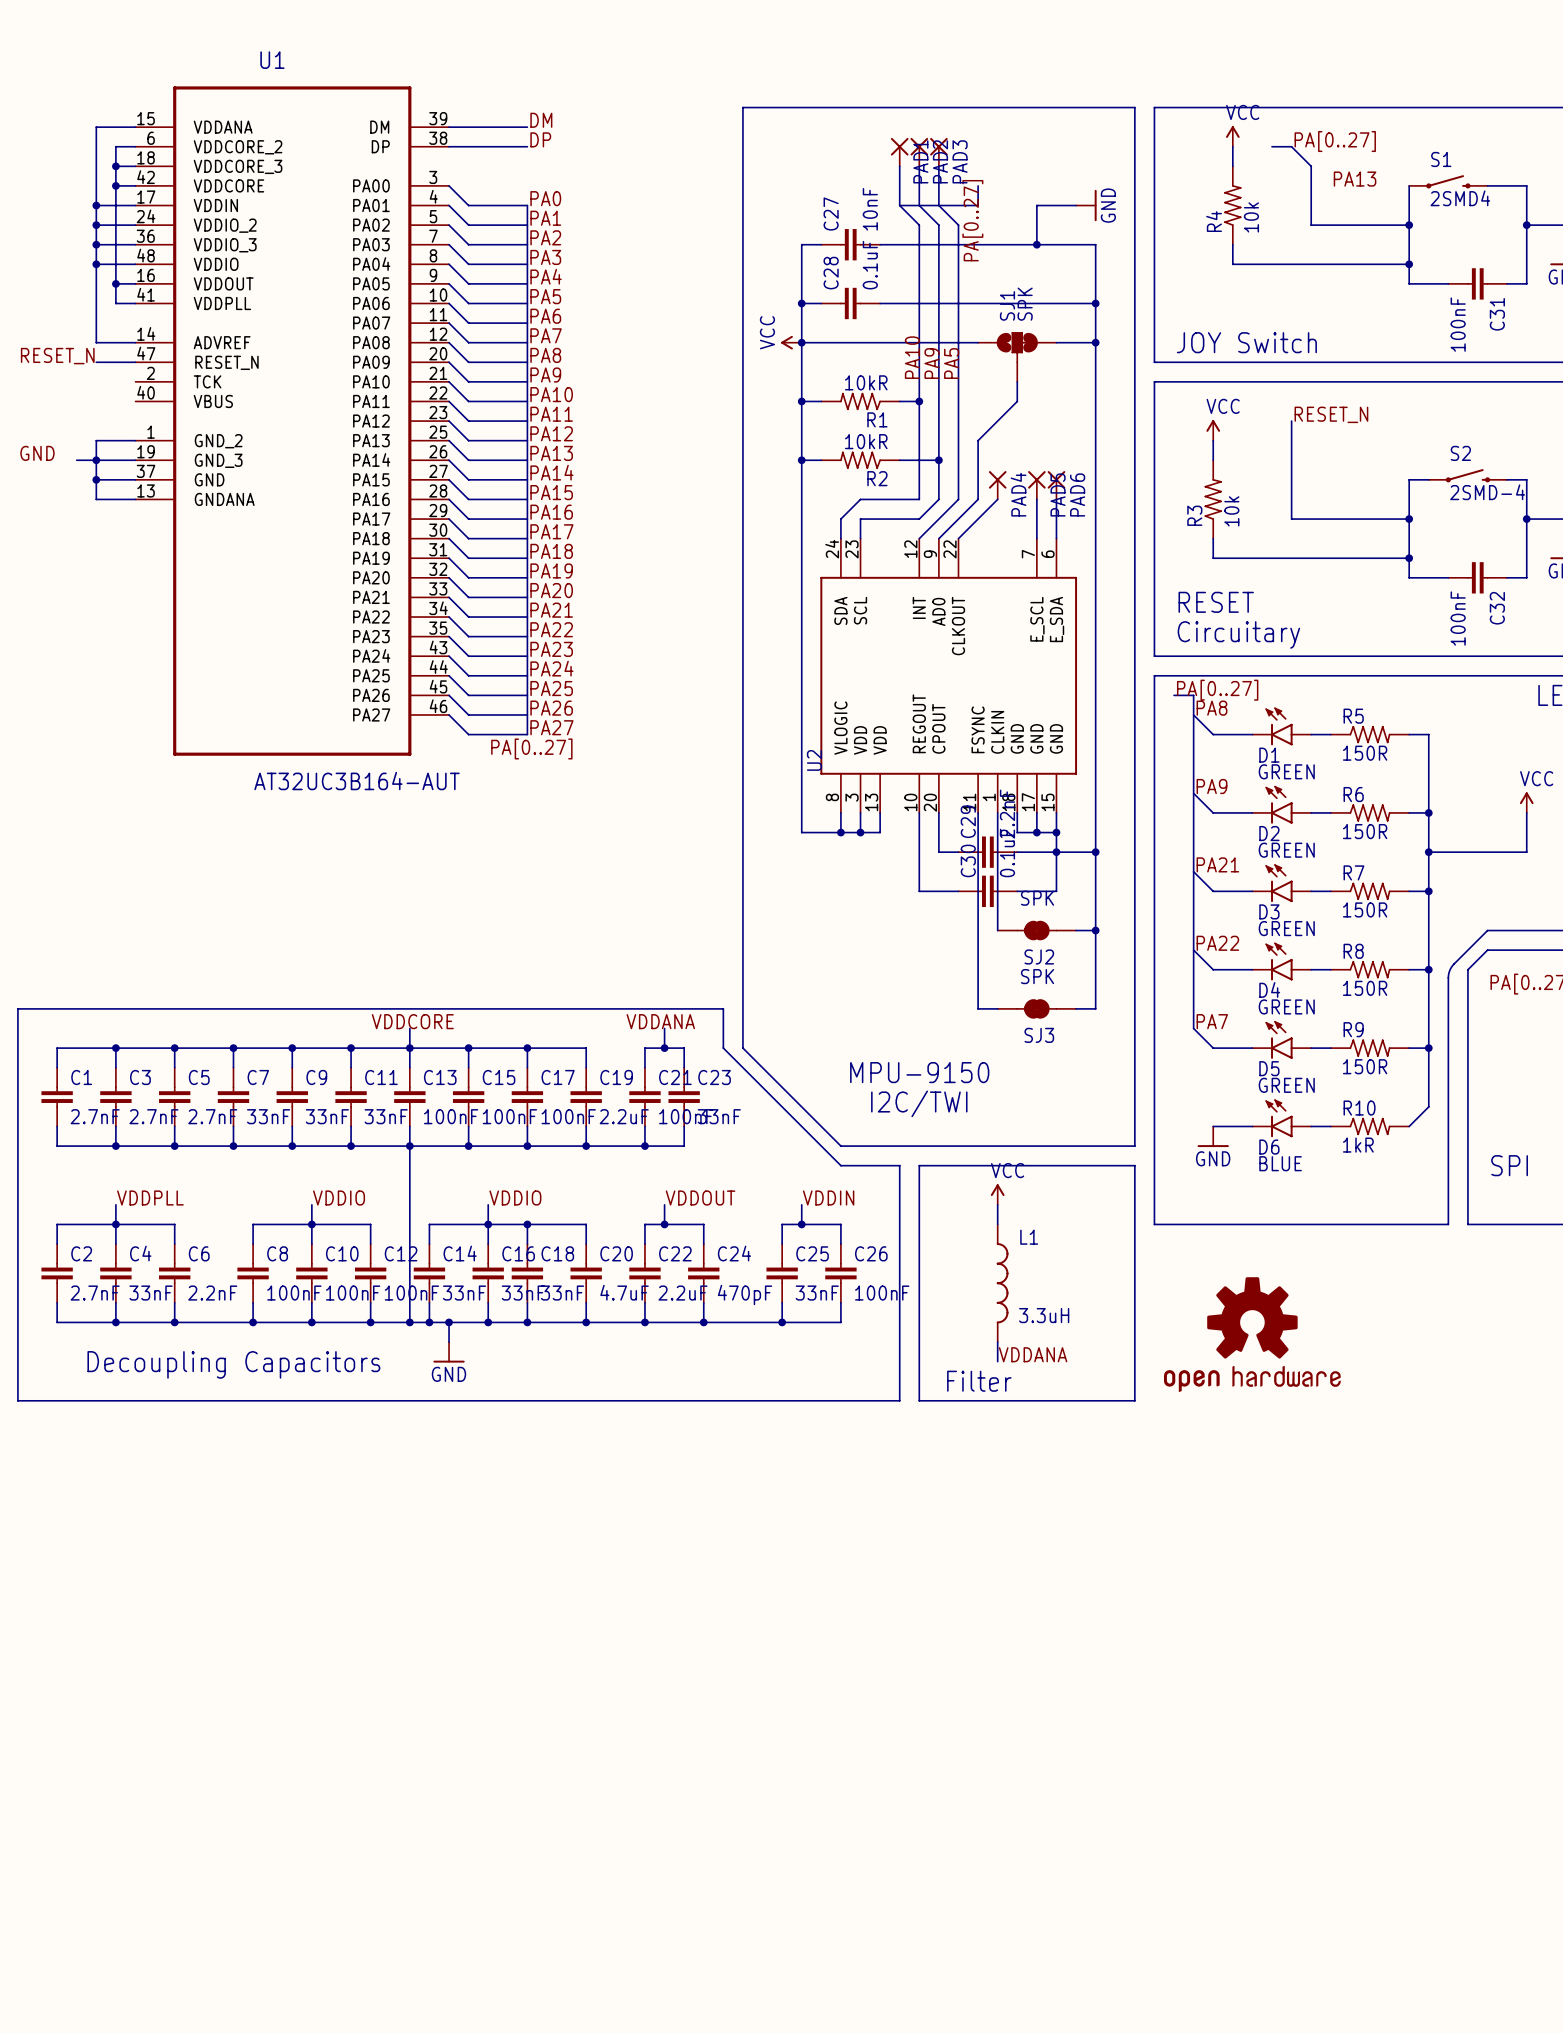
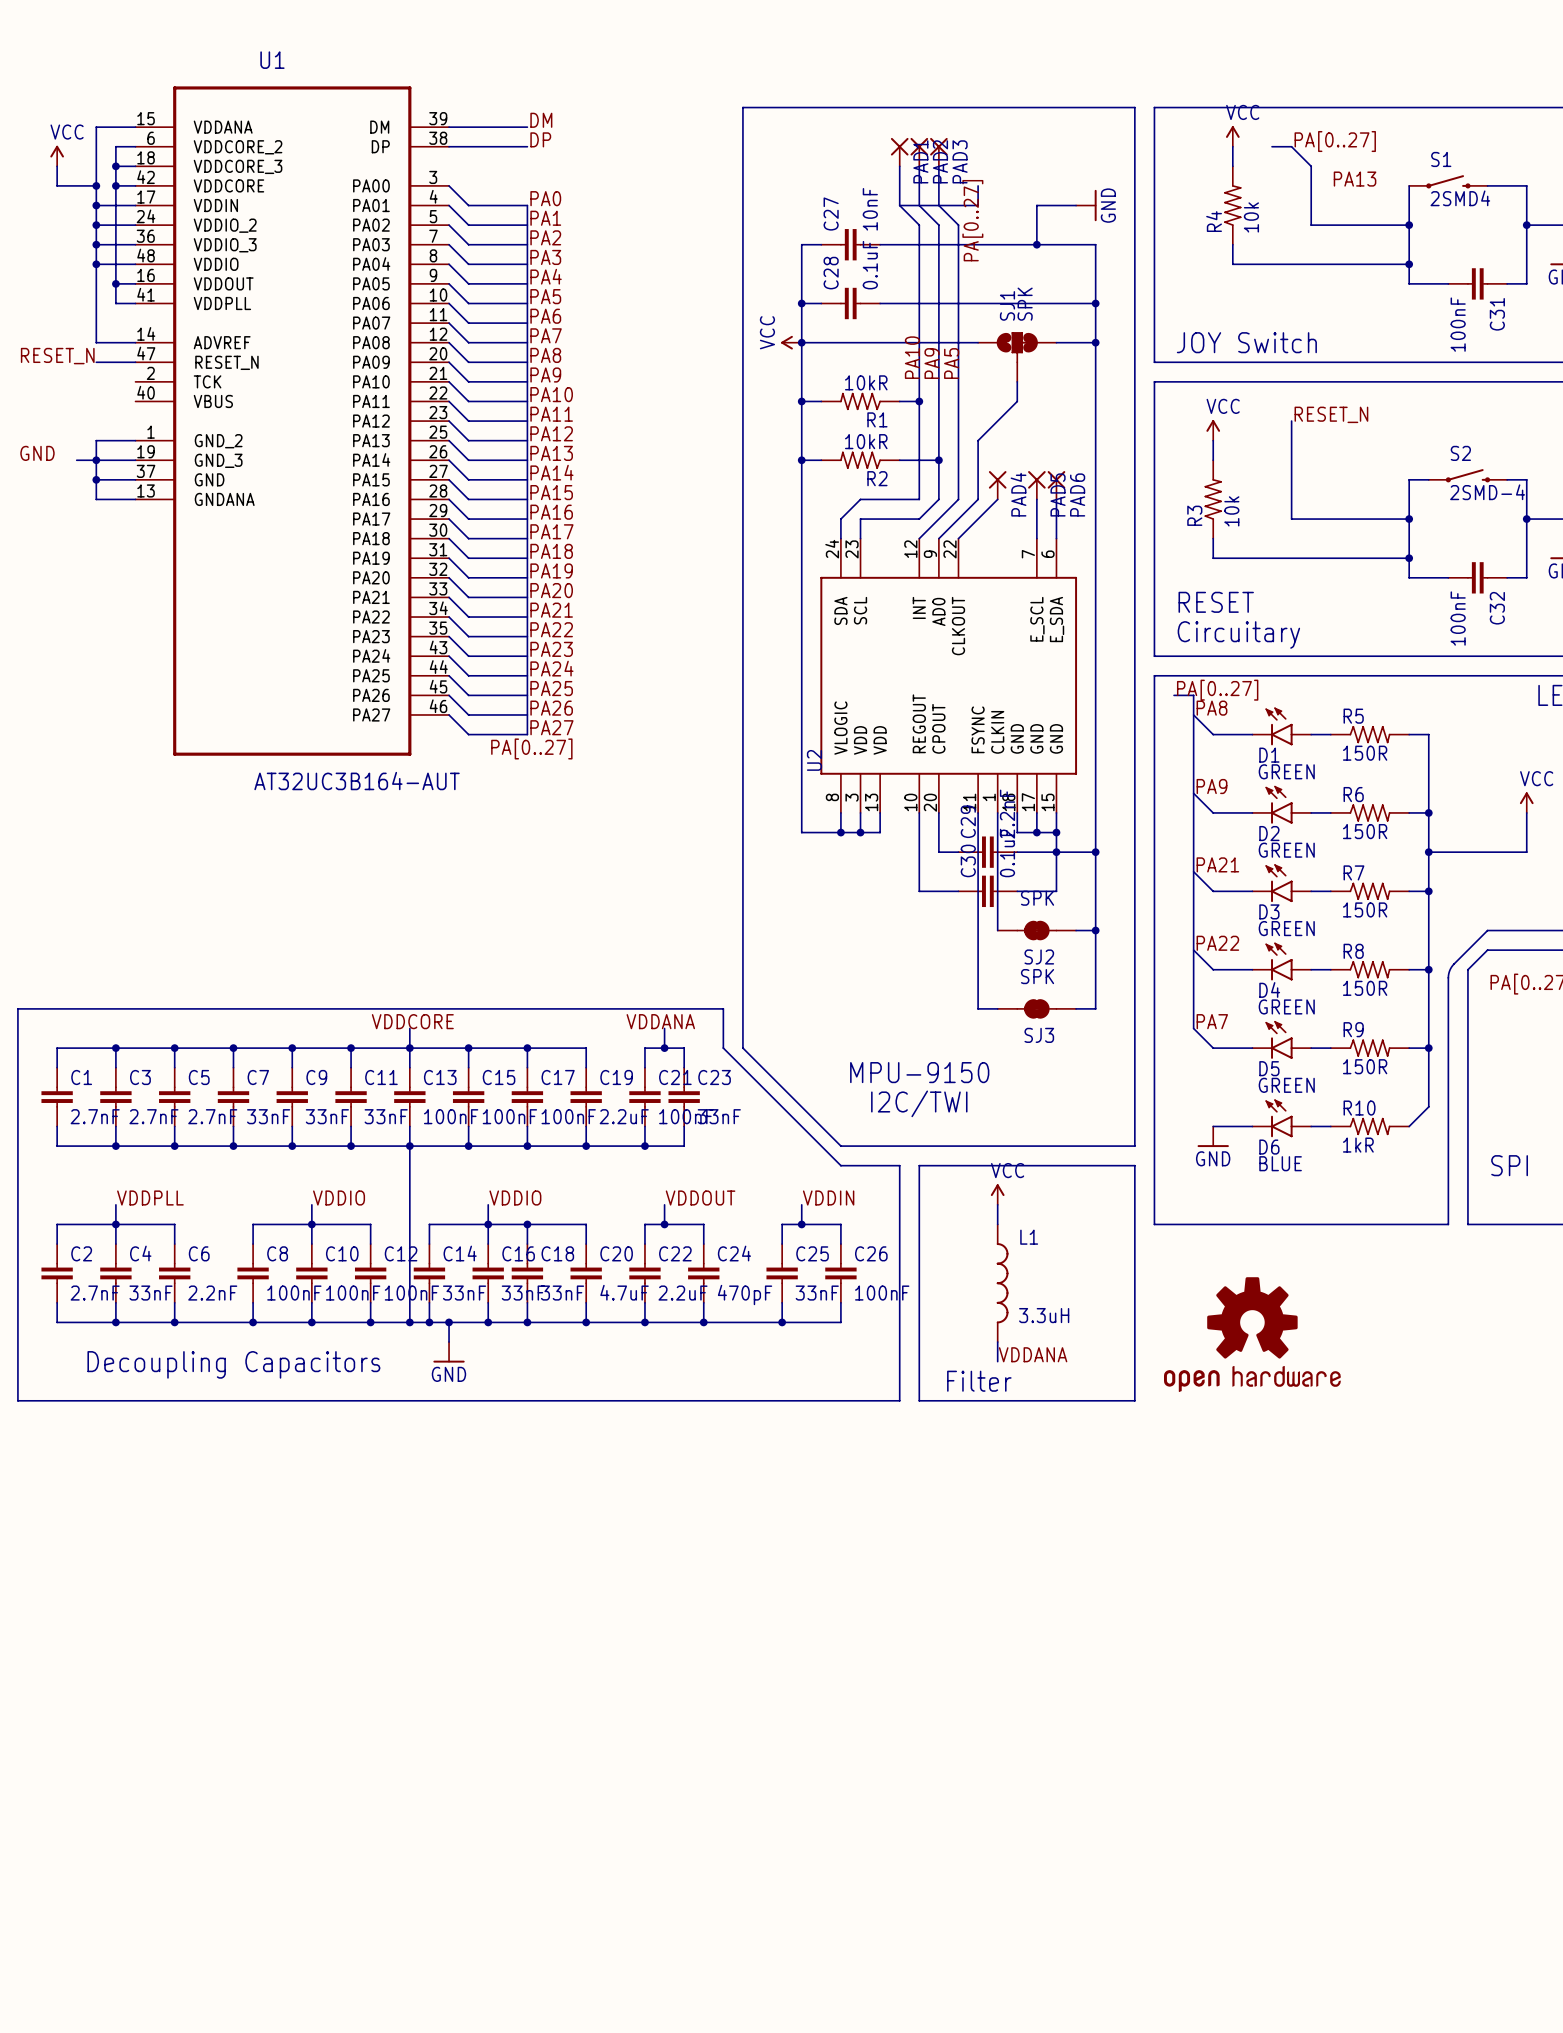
power symbol: none -> VCC (57, 156)
wire: none -> (57, 166) (57, 185) (96, 185)
junction: none -> (96, 185)

